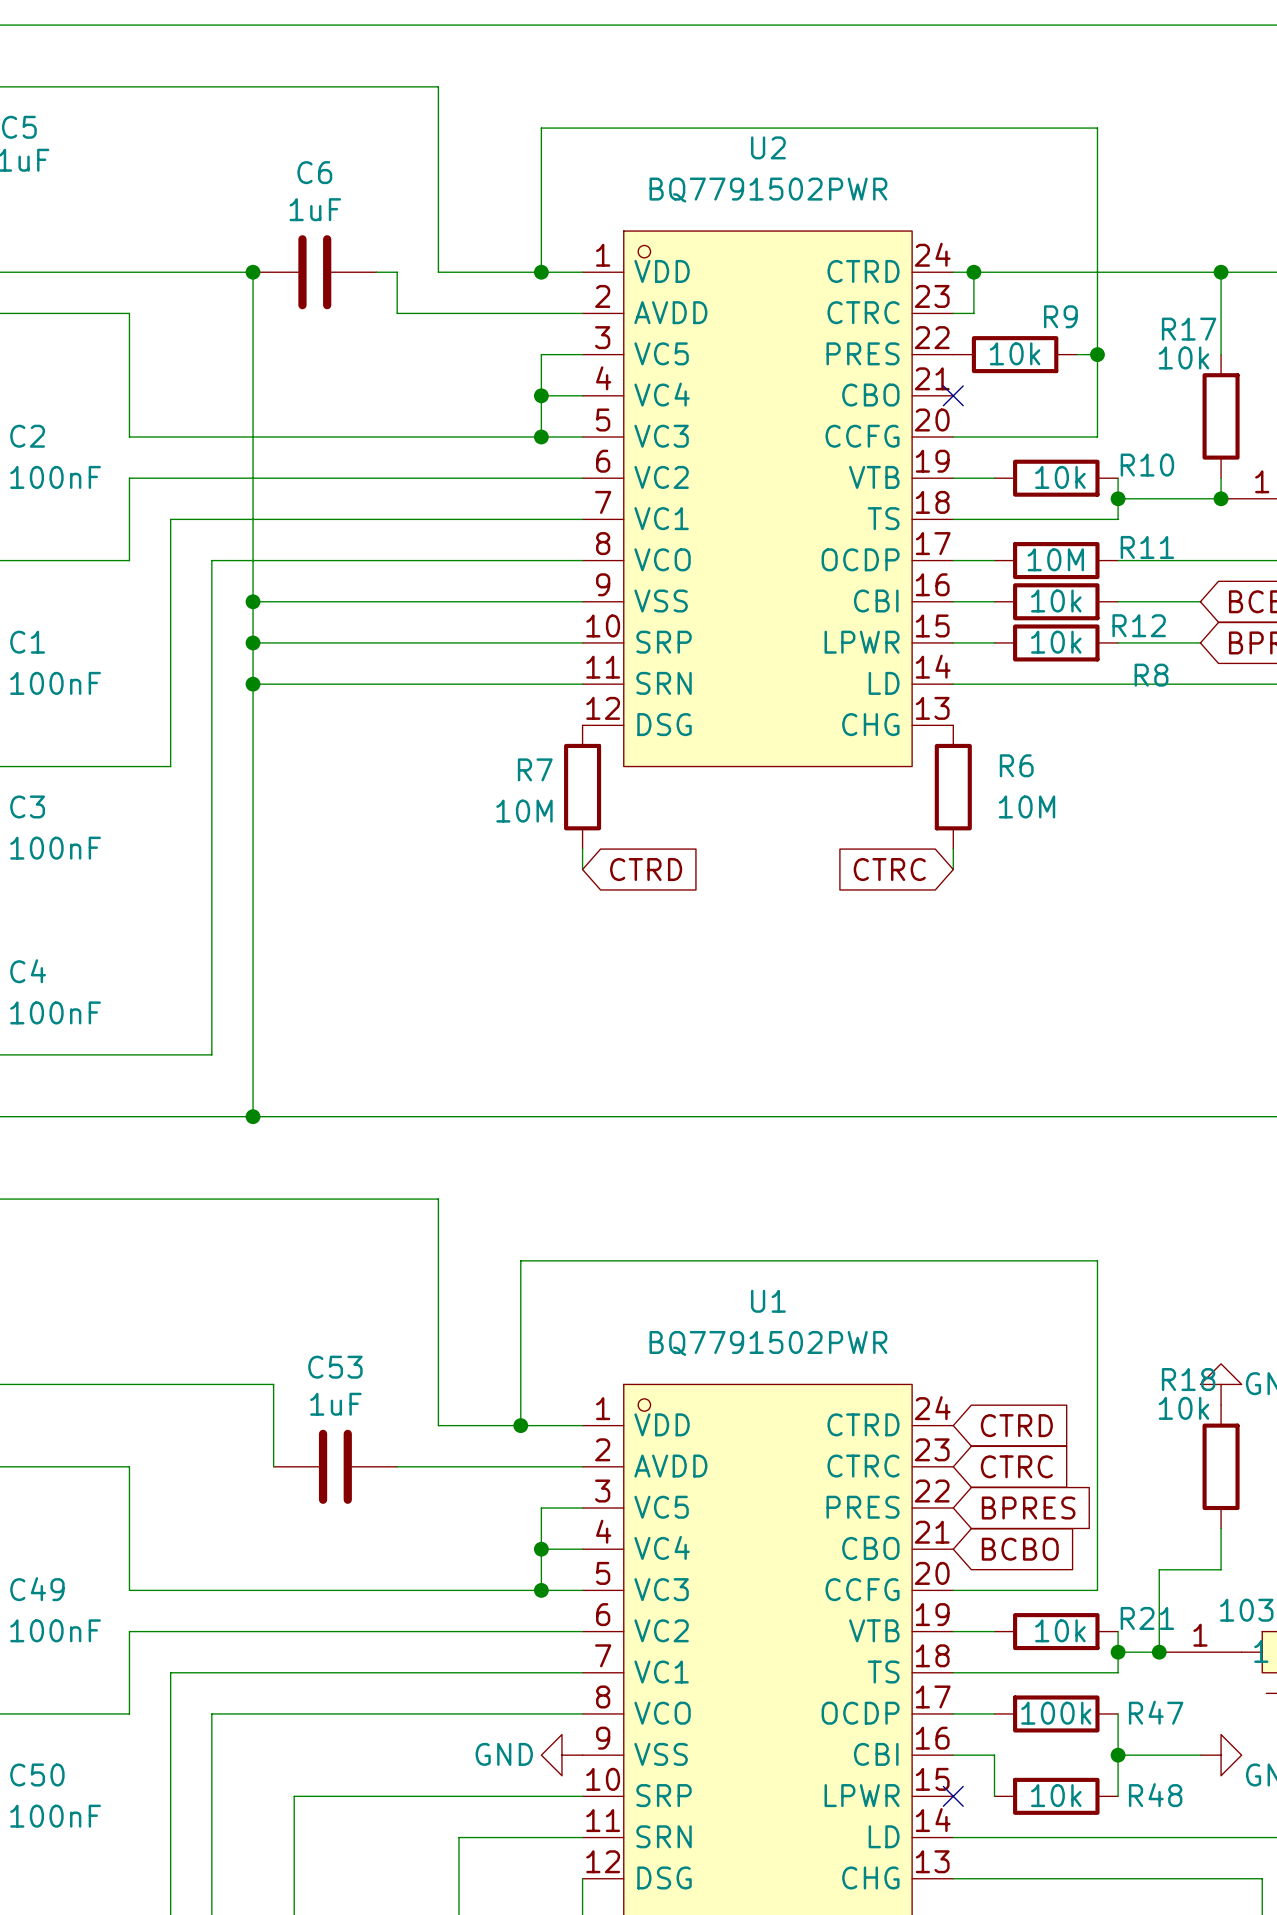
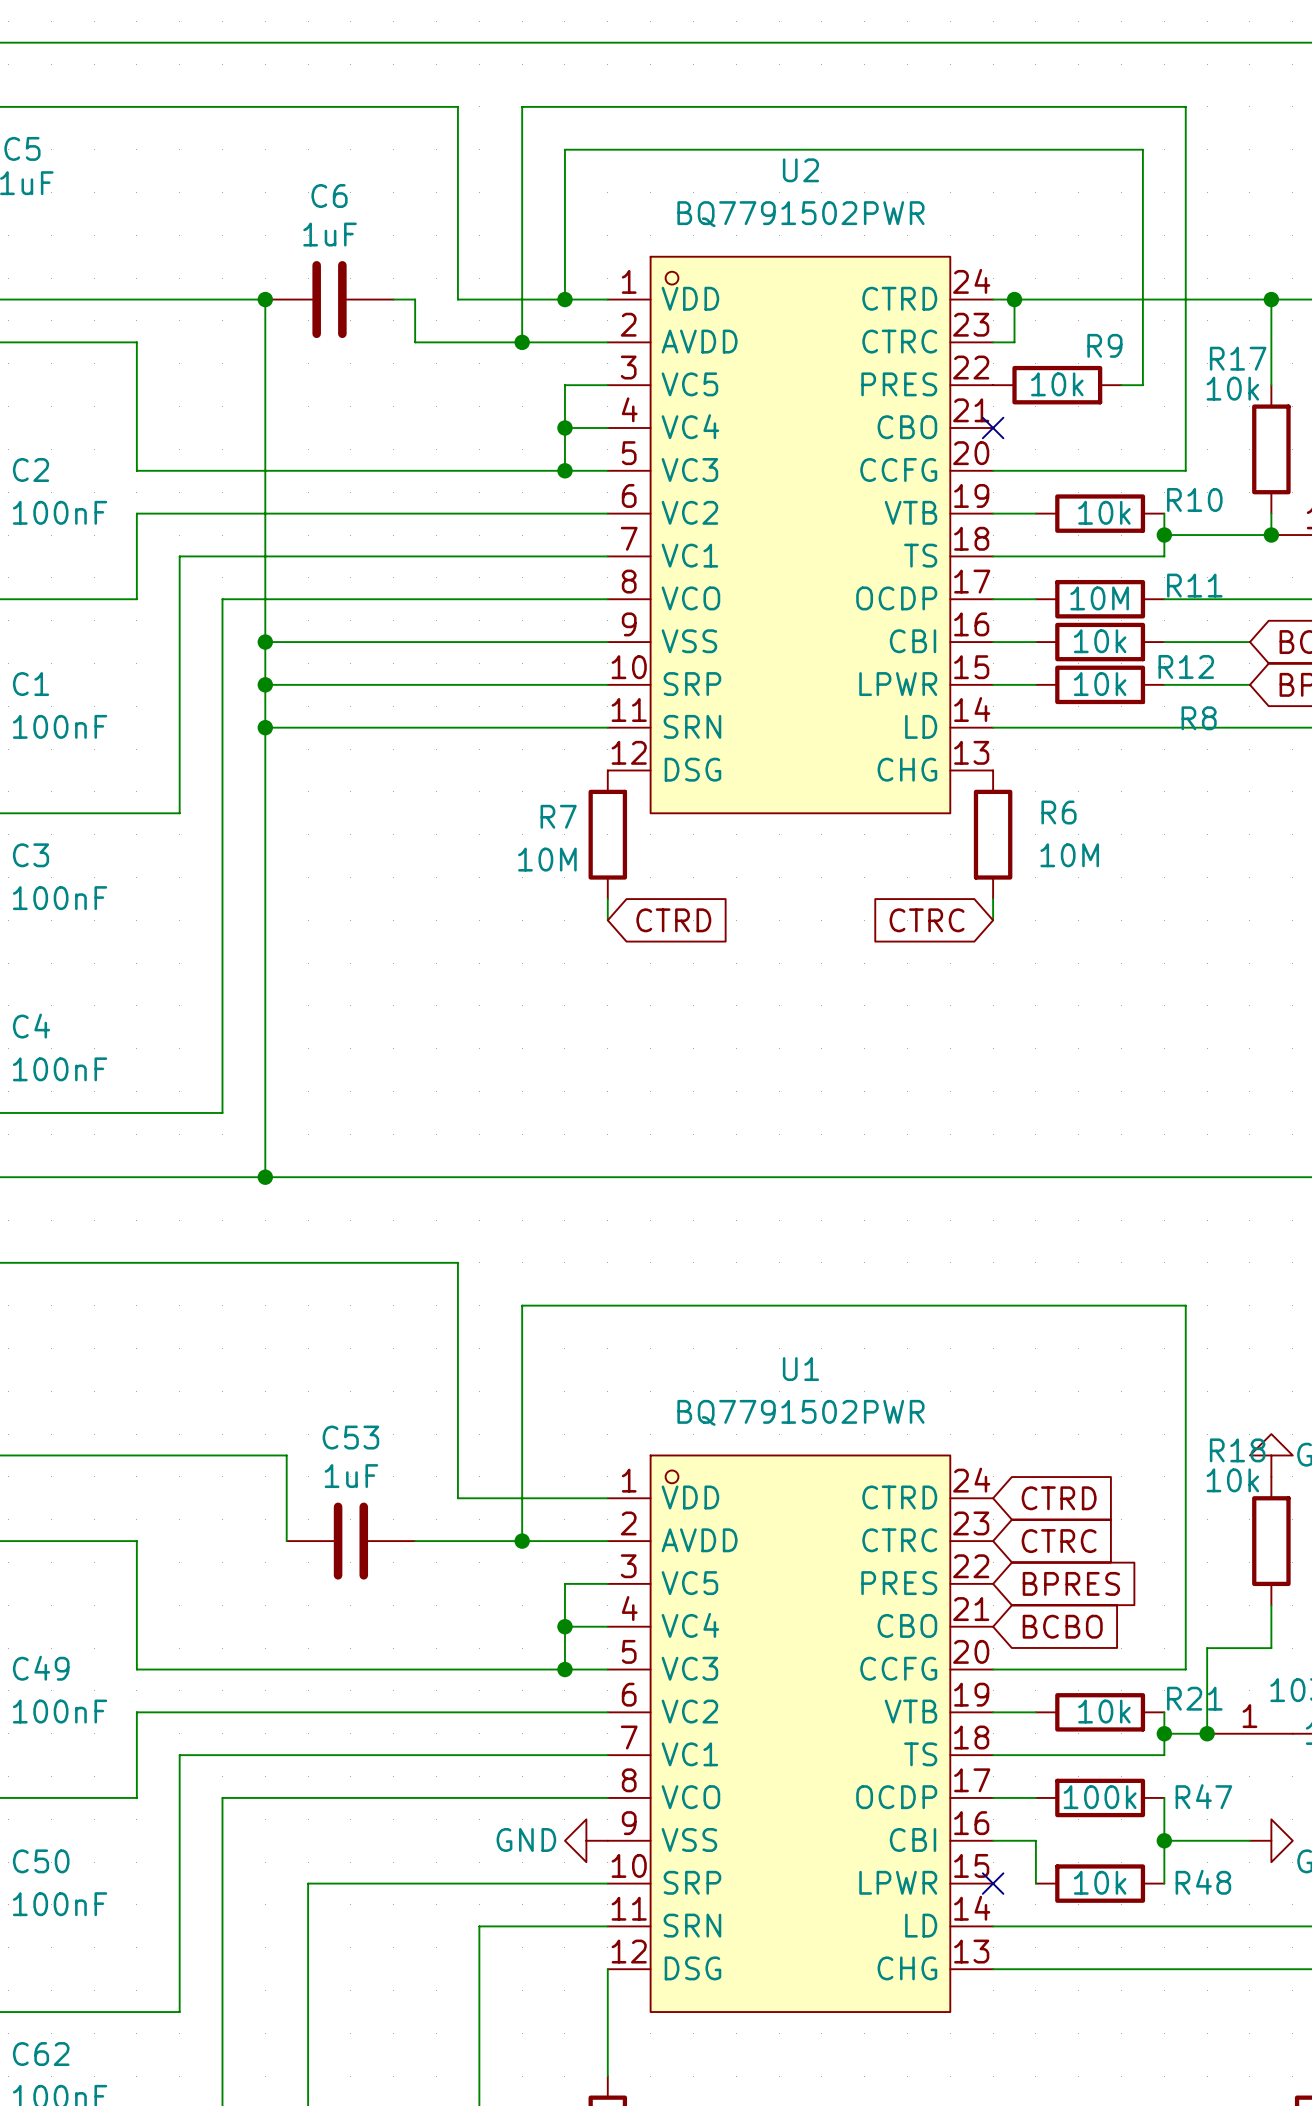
junction: none -> (522, 342)
wire: (1097, 354) (1097, 437) -> (522, 342) (522, 106) (1185, 106) (1185, 470) (1142, 470)
junction: (1097, 354) -> none
wire: (520, 1425) (520, 1260) (1097, 1260) (1097, 1590) -> (522, 1541) (522, 1305) (1185, 1305) (1185, 1669) (1142, 1669)
junction position: (520, 1425) -> (522, 1541)

